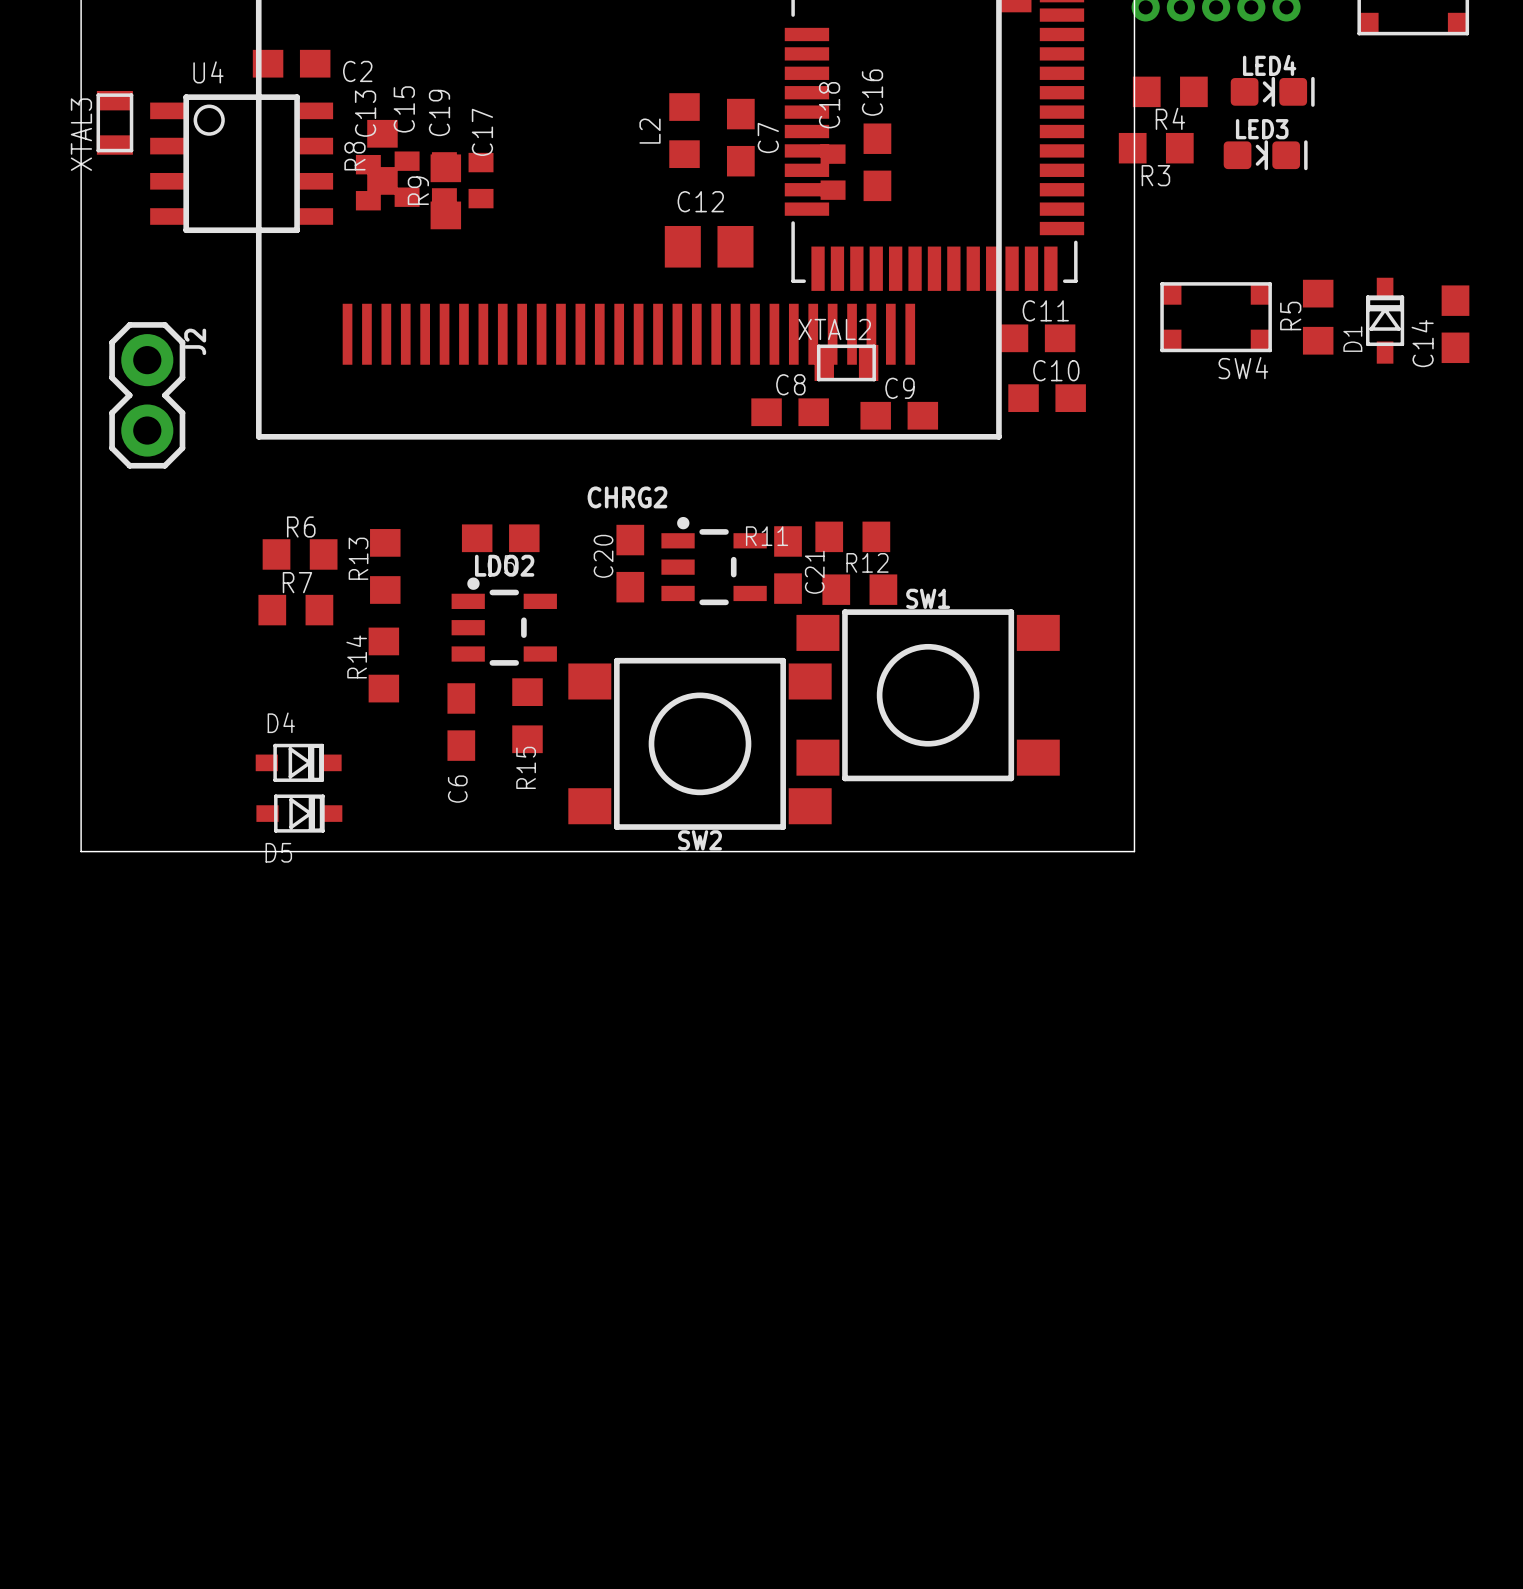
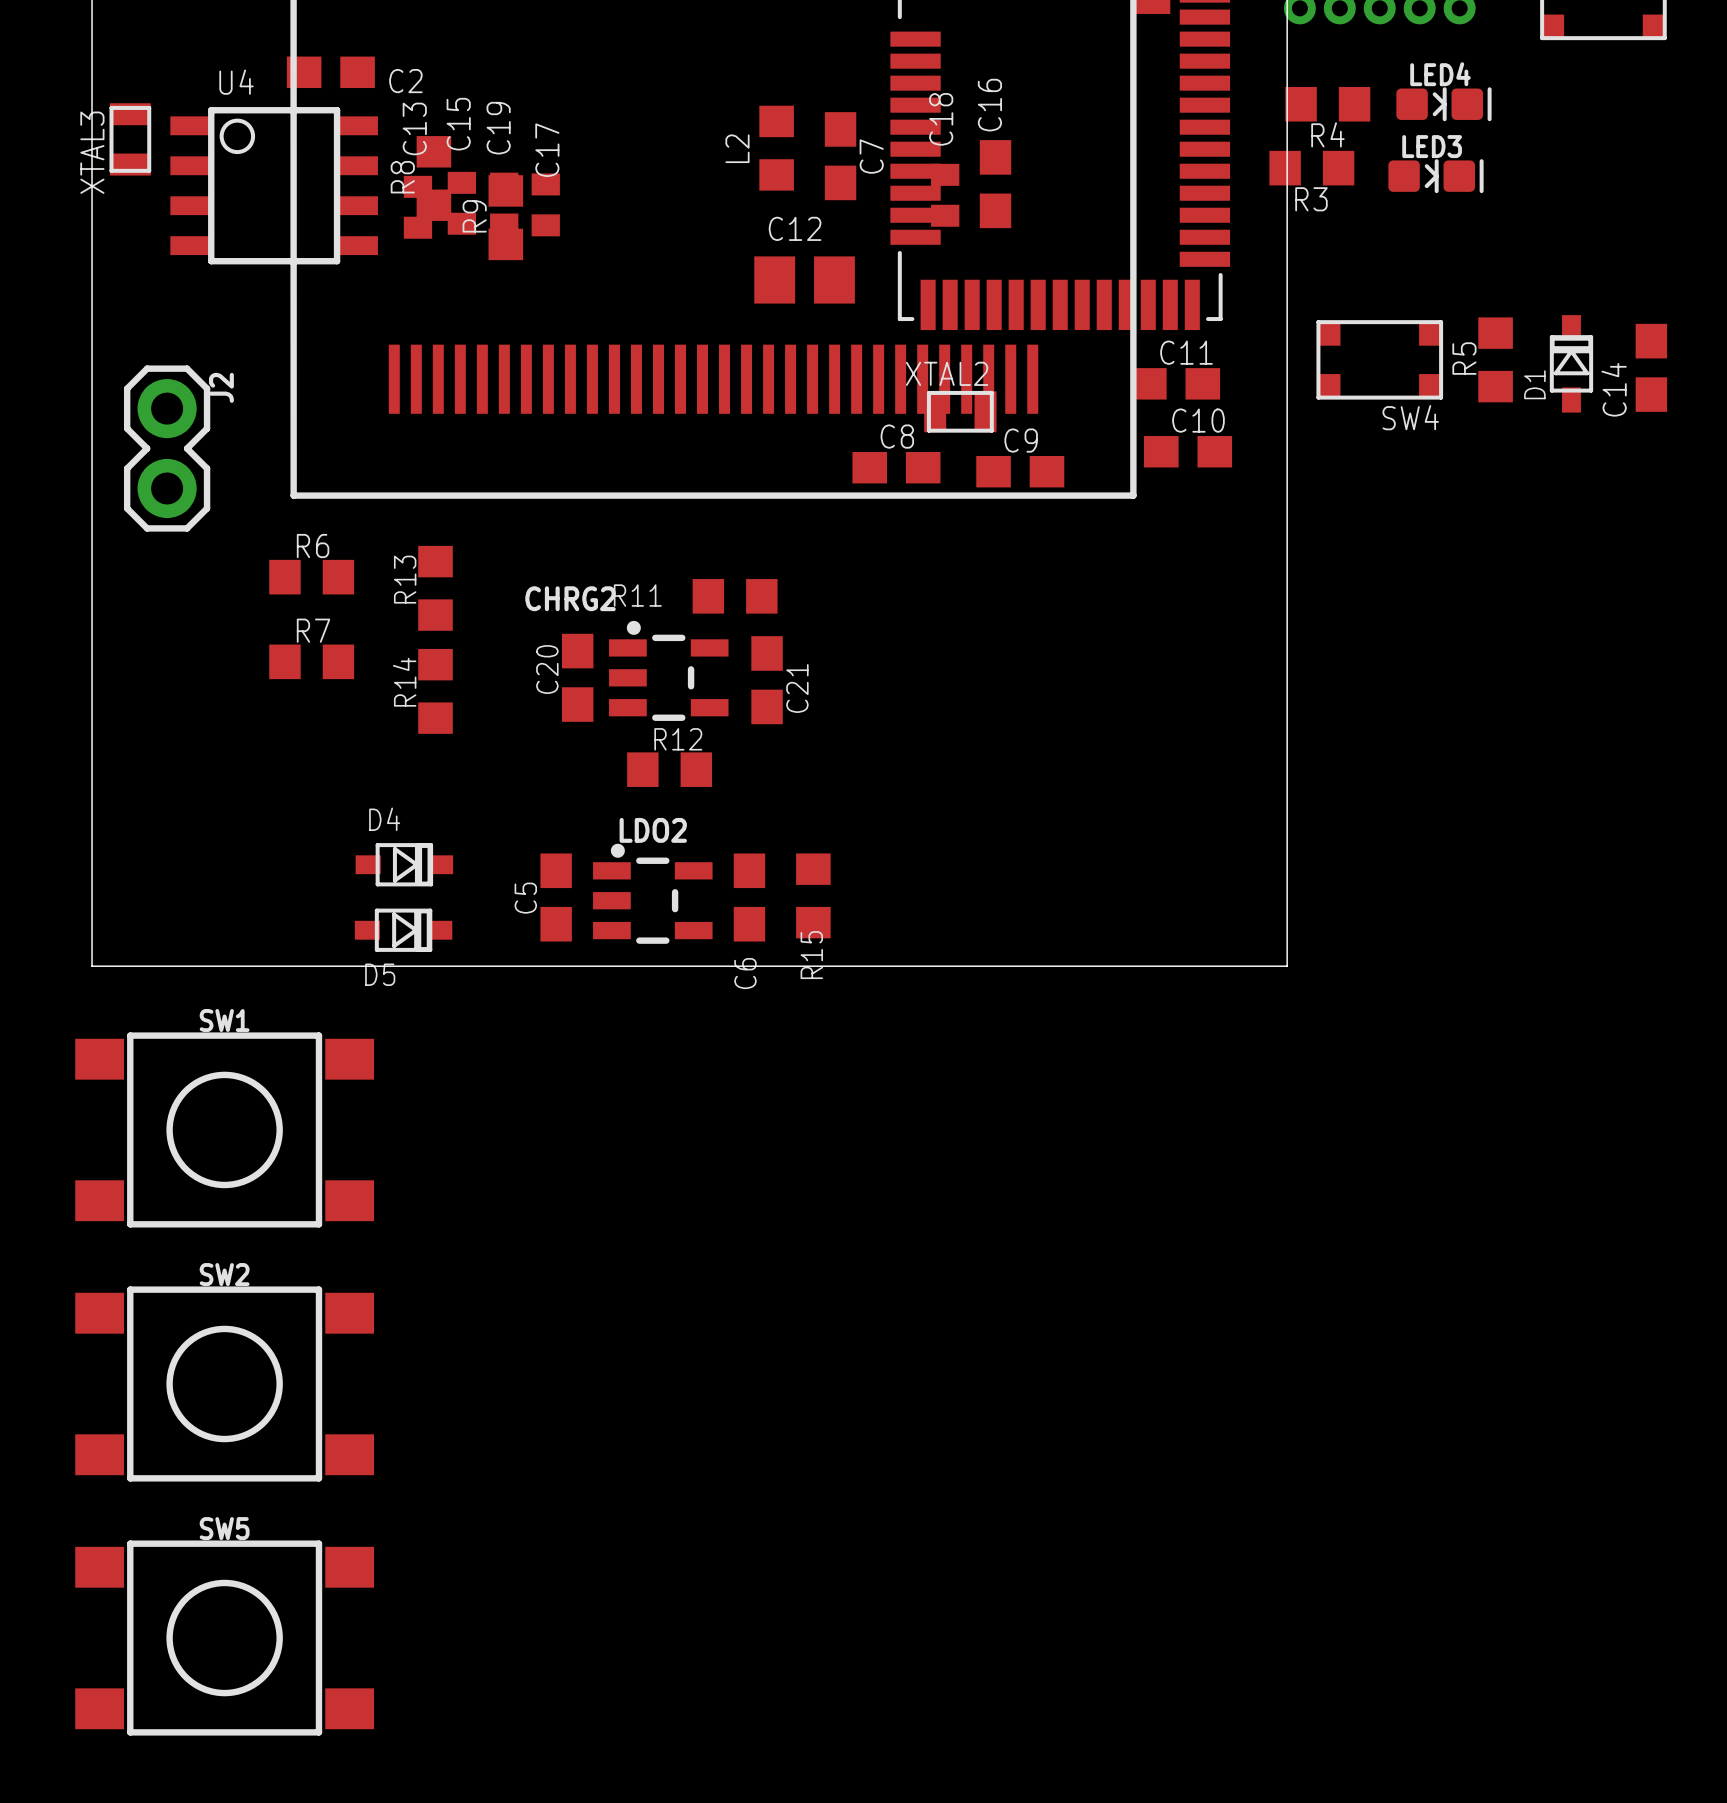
R11 position: (852, 536) -> (735, 596)
C5 rotation: 0° (500, 538) -> 90° clockwise (556, 897)
C5 position: (500, 538) -> (556, 897)
R6 position: (300, 554) -> (311, 577)
CHRG2 position: (714, 561) -> (668, 670)
C20 position: (630, 563) -> (577, 677)
C21 position: (788, 565) -> (767, 680)
R13 position: (385, 566) -> (435, 588)
R12 position: (859, 589) -> (669, 769)
R7 position: (295, 610) -> (311, 661)
LDO2 position: (504, 621) -> (652, 893)
R14 position: (383, 665) -> (435, 691)
SW1 position: (928, 695) -> (224, 1129)
R15 position: (527, 715) -> (813, 895)
C6 position: (461, 722) -> (749, 897)
SW2 position: (700, 743) -> (224, 1383)
D4 position: (298, 762) -> (404, 864)
D5 position: (299, 813) -> (403, 930)
SW2 name position: SW2 (700, 840) -> SW2 (224, 1274)
SW5: none -> (224, 1638)

